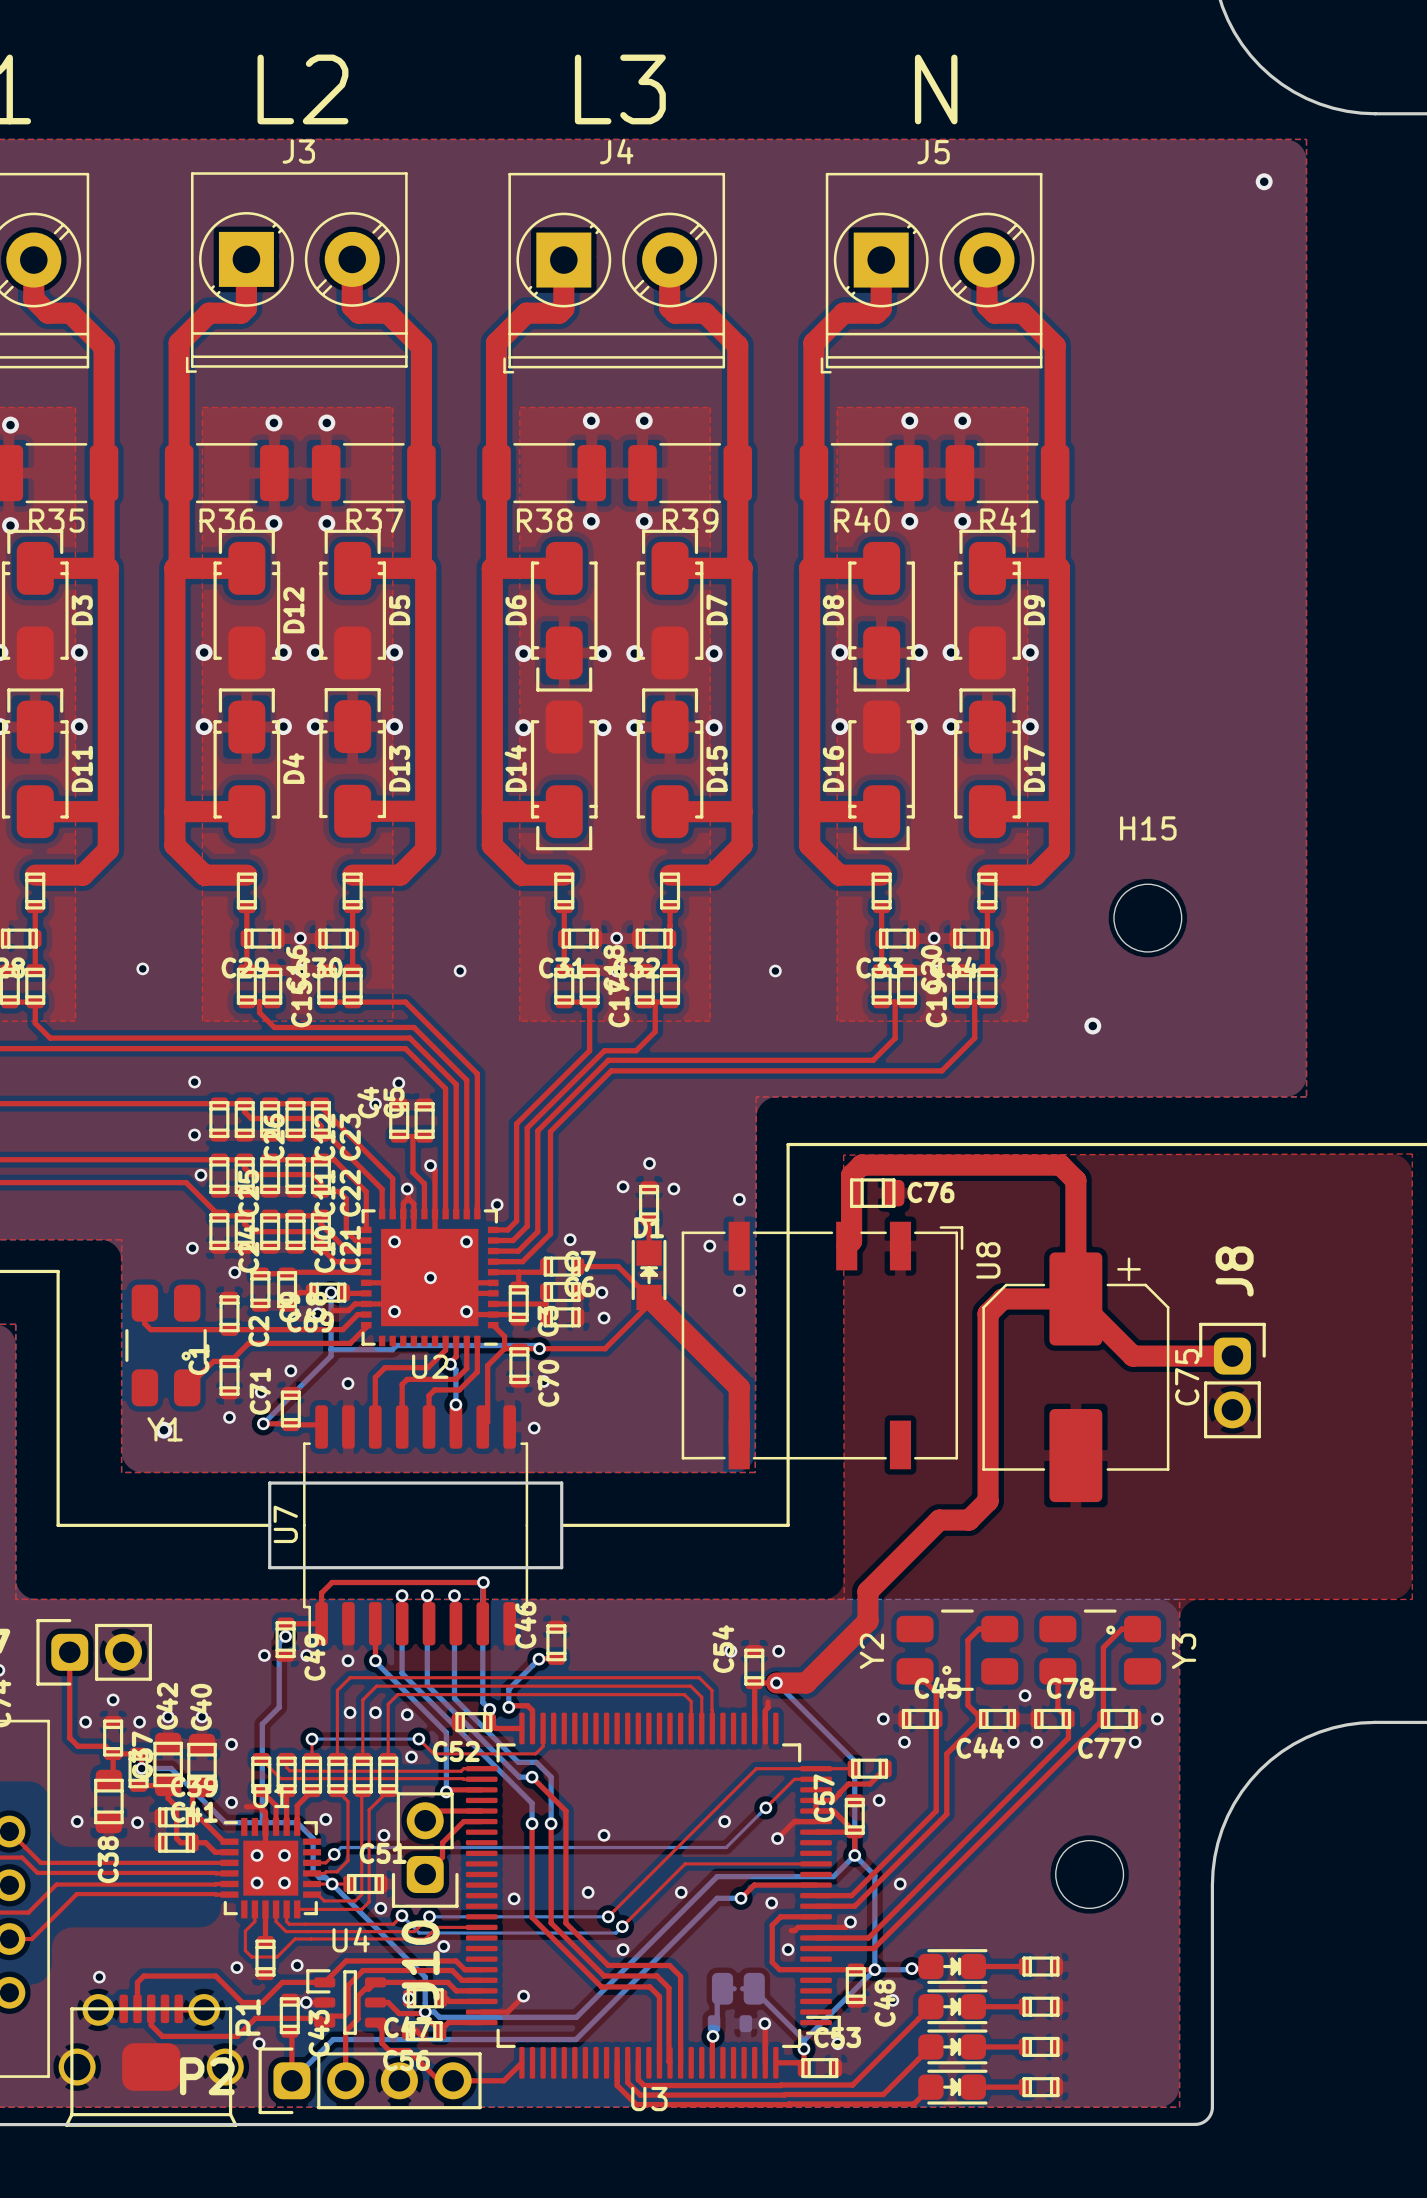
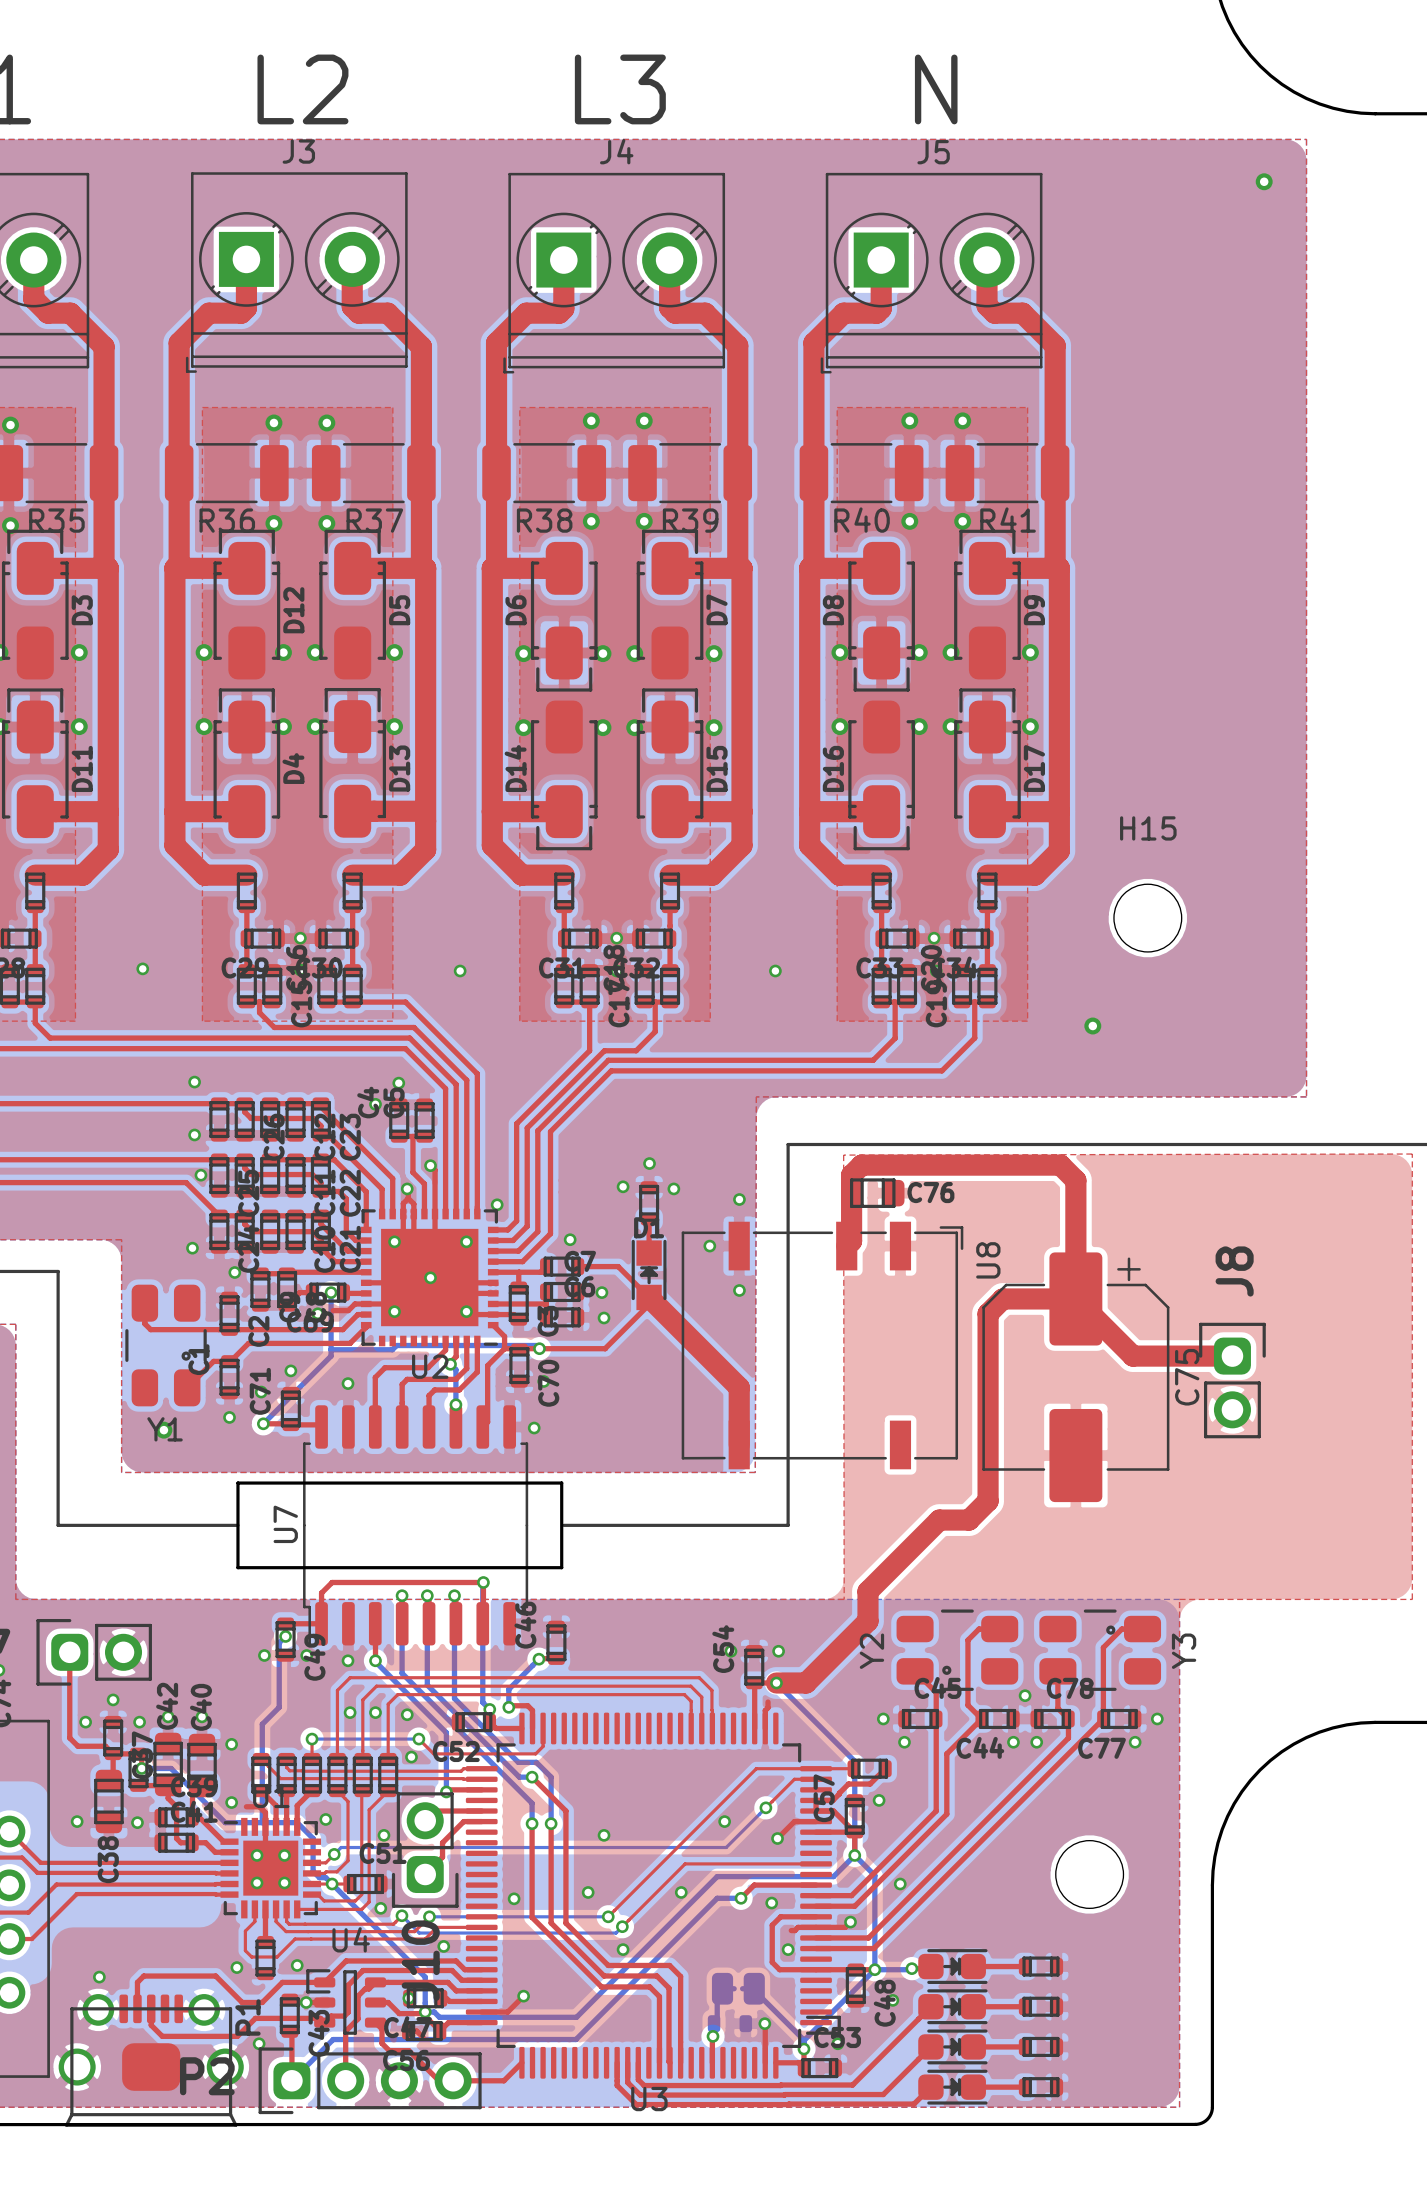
board edge: (269, 1483) (269, 1567) -> (269, 1483) (237, 1483) (237, 1567) (269, 1567)
line: (237, 1525) (269, 1525) -> none

